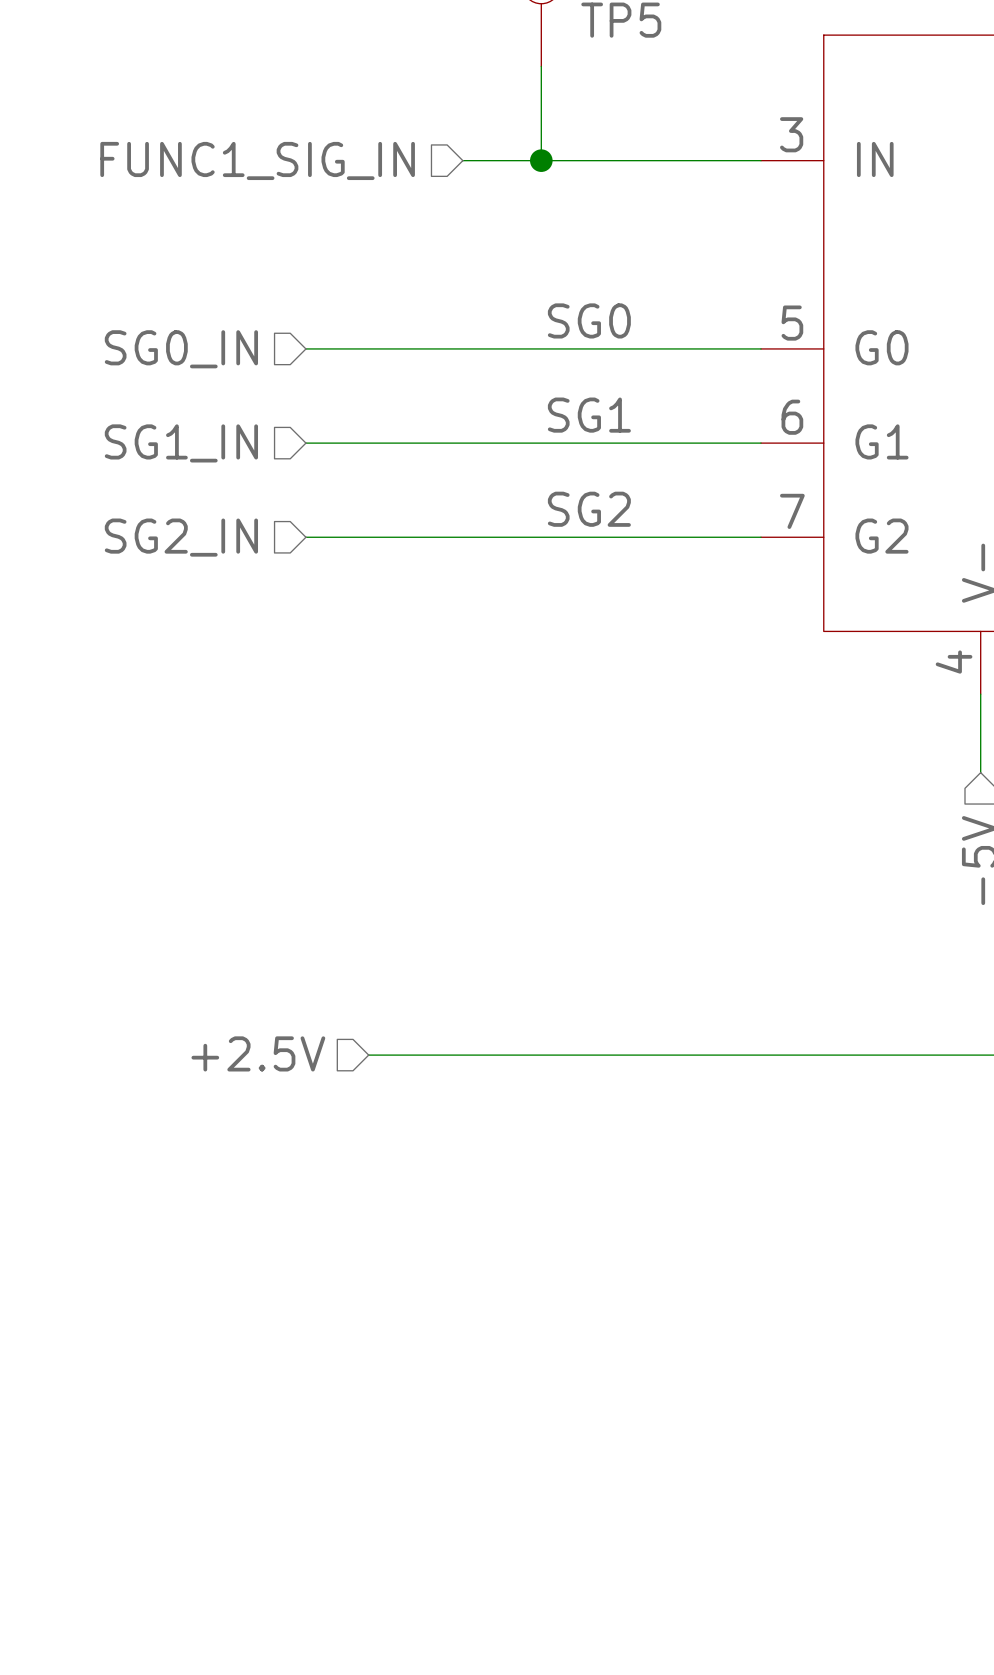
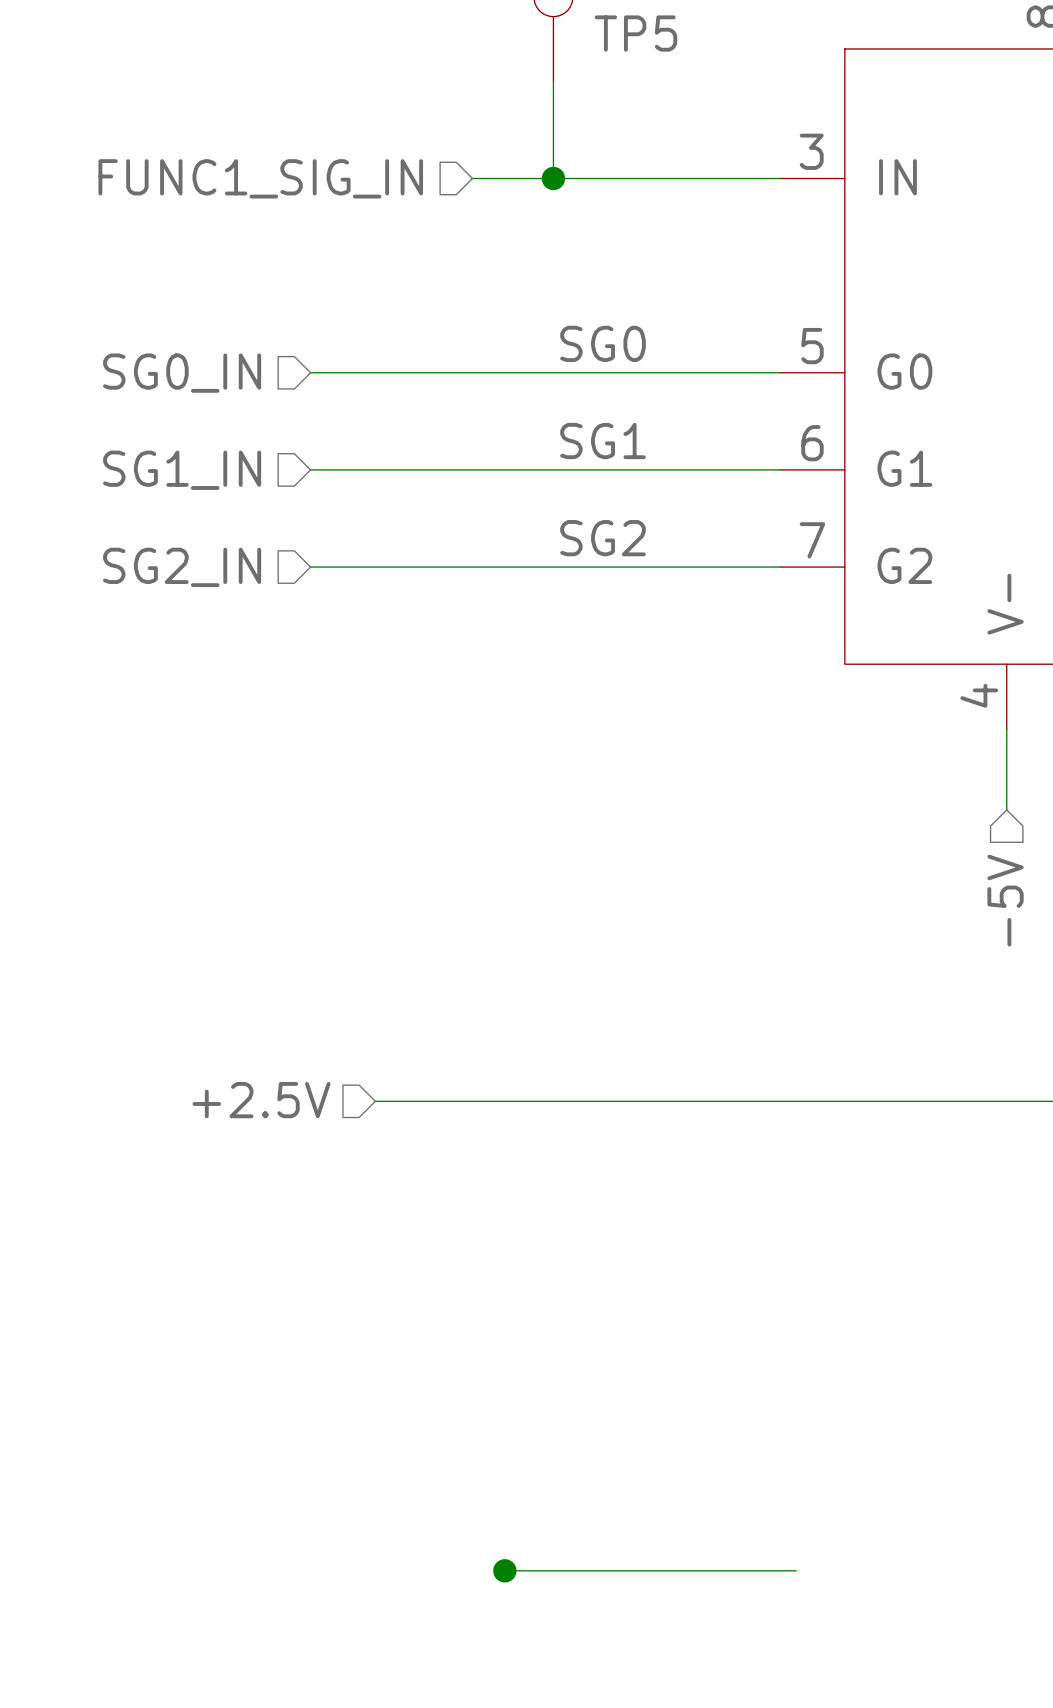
wire: none -> (504, 1570) (796, 1570)
junction: none -> (504, 1570)

